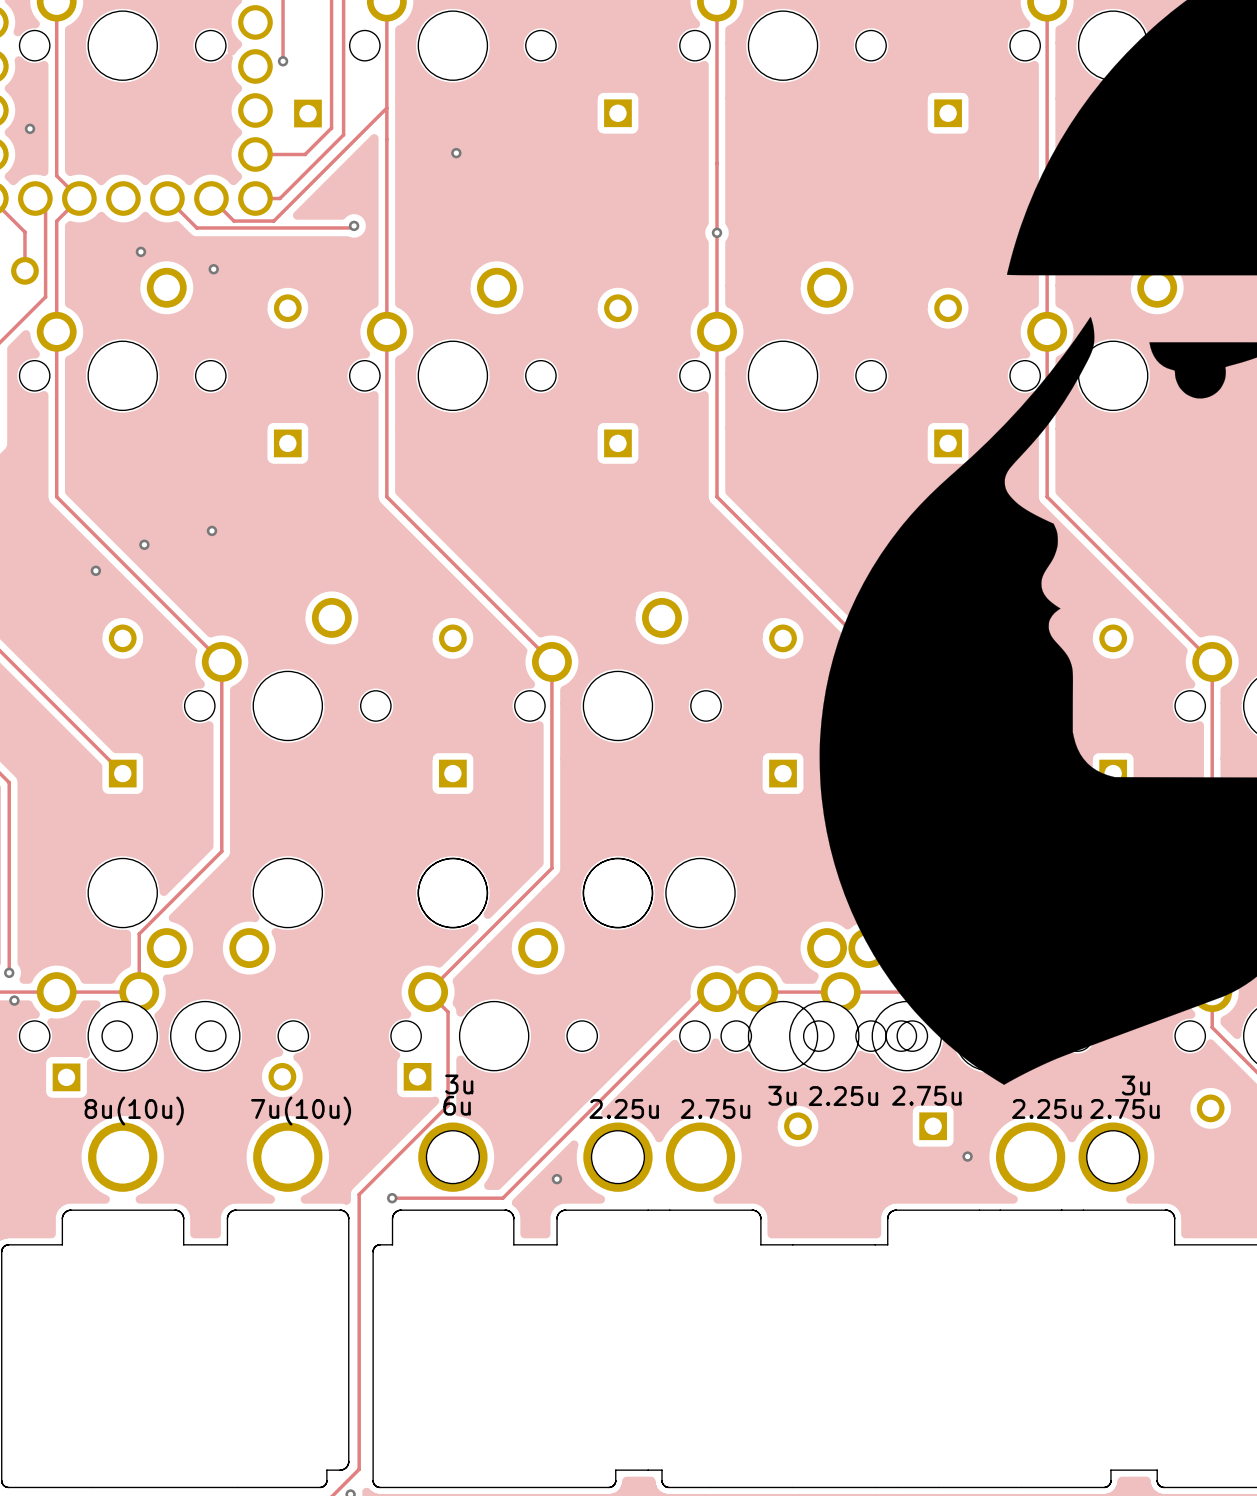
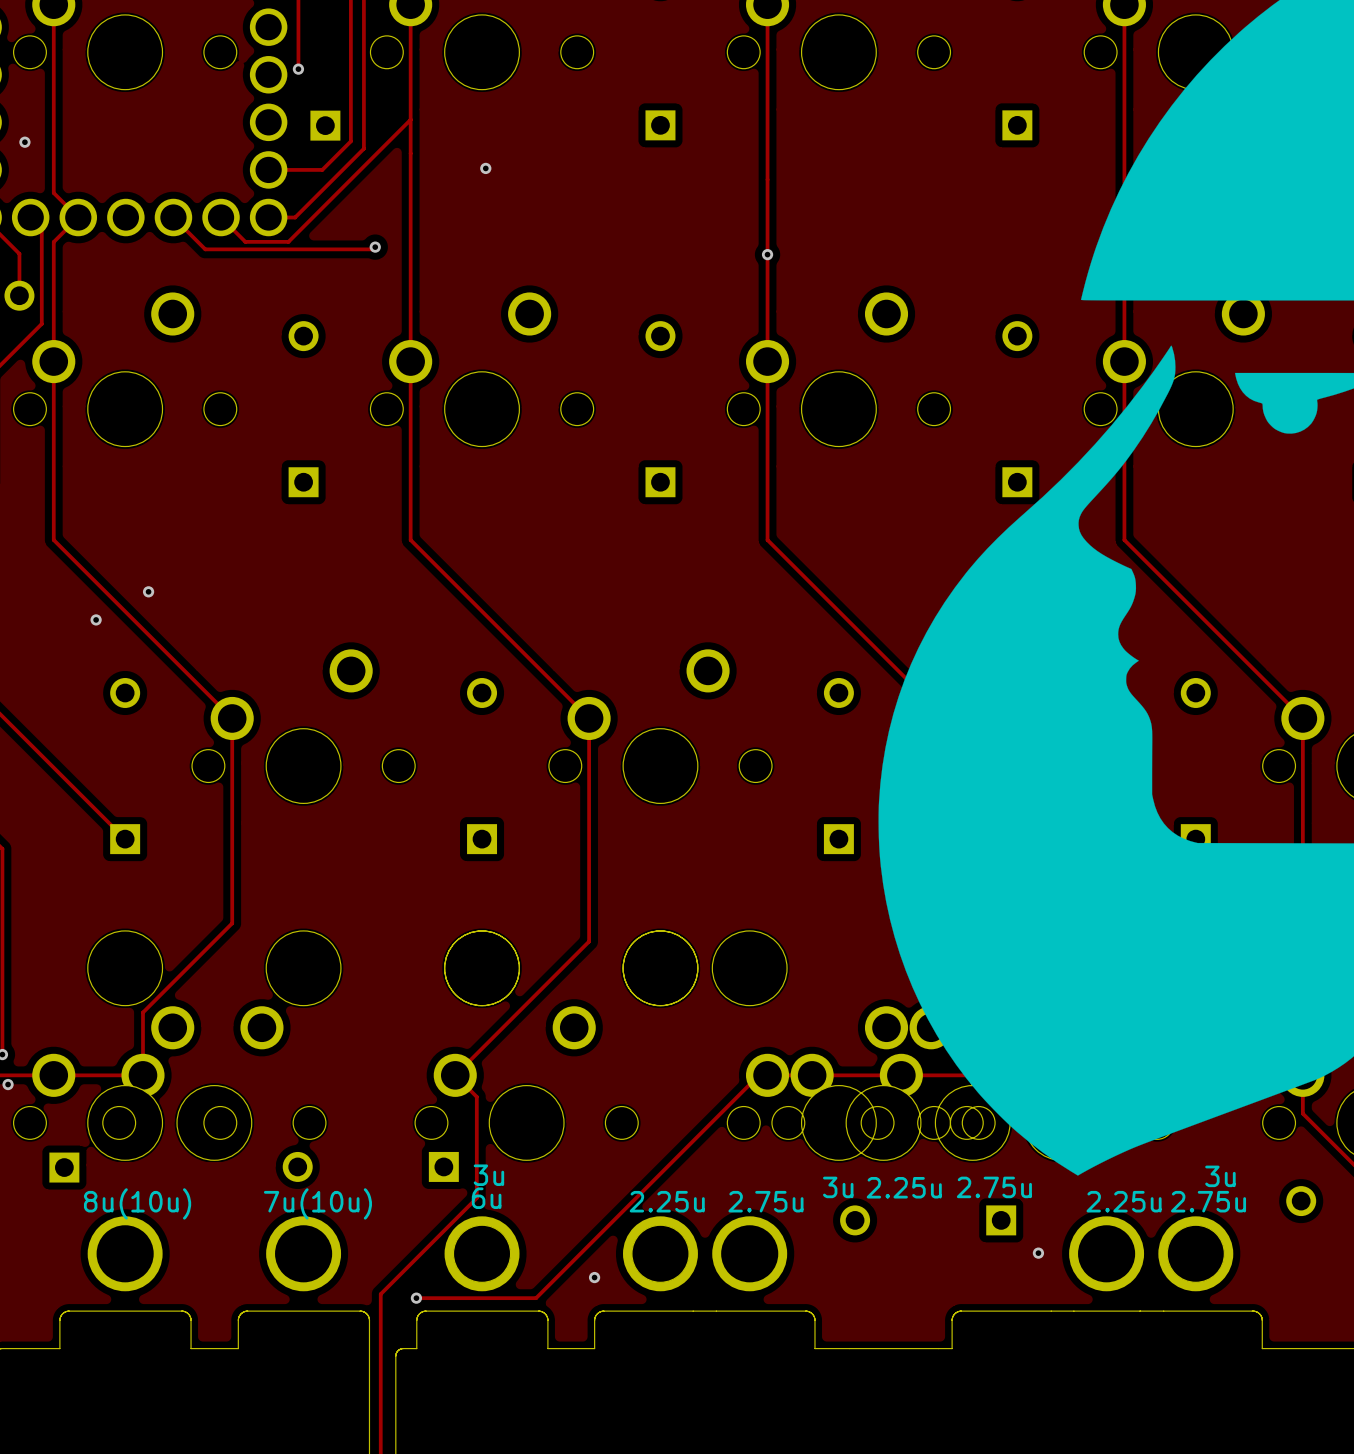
via: (140, 251) -> none
via: (213, 269) -> none
via: (211, 530) -> none

